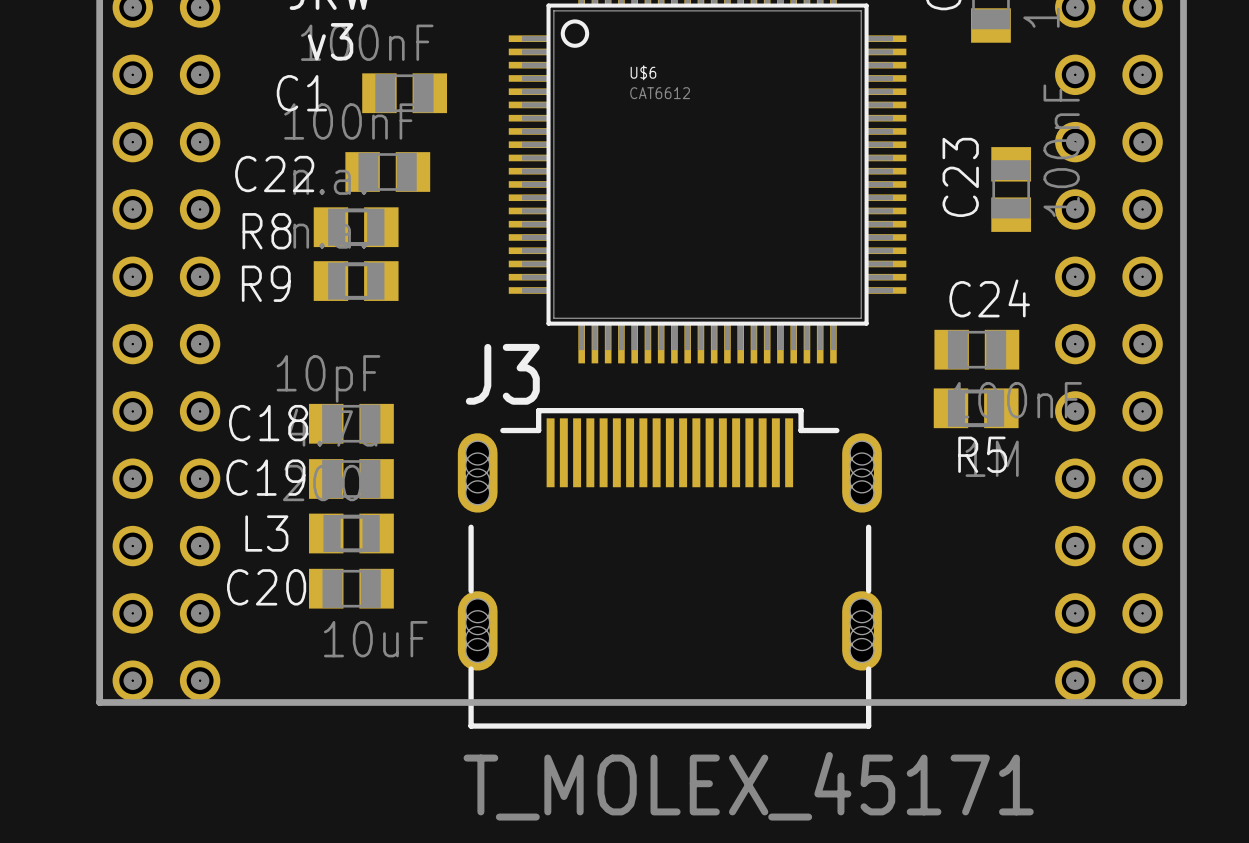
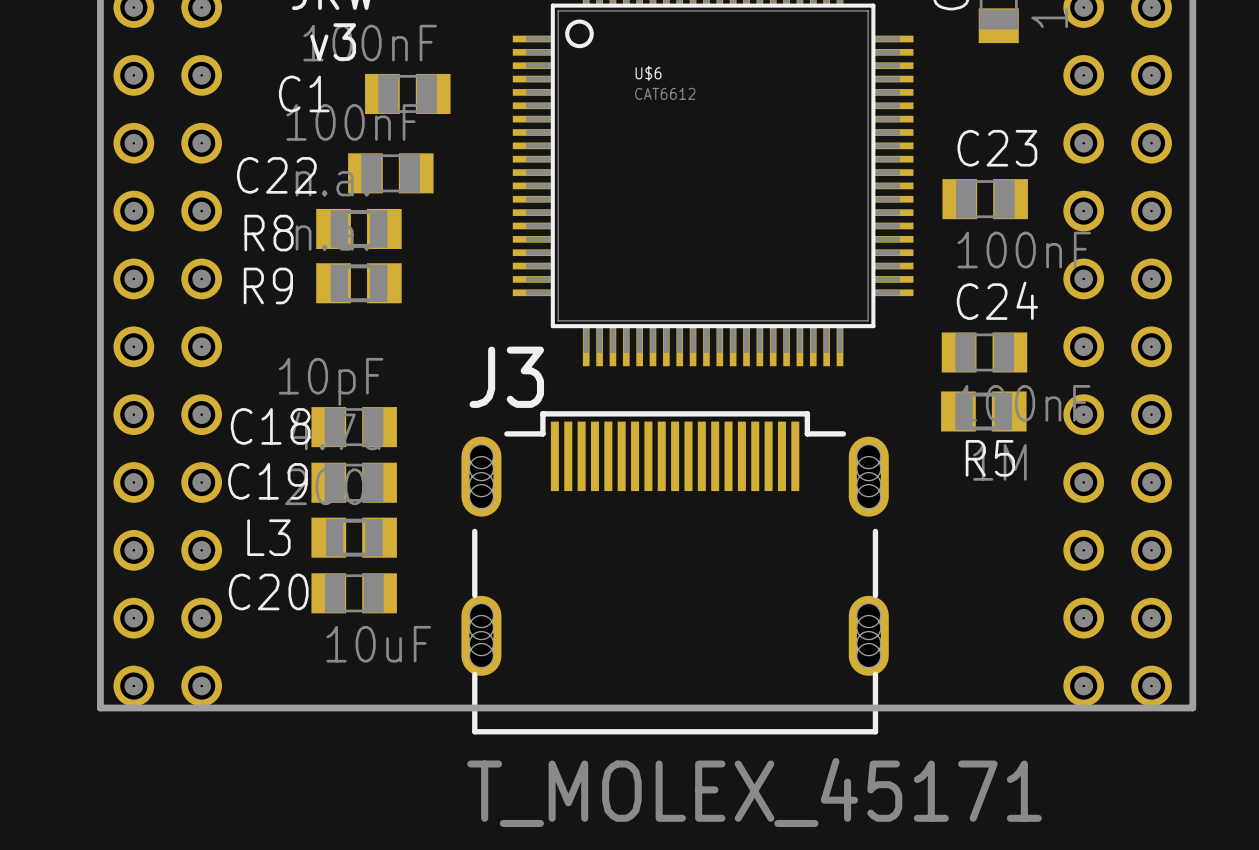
C23 rotation: 0° (1011, 189) -> 90° clockwise (985, 199)

